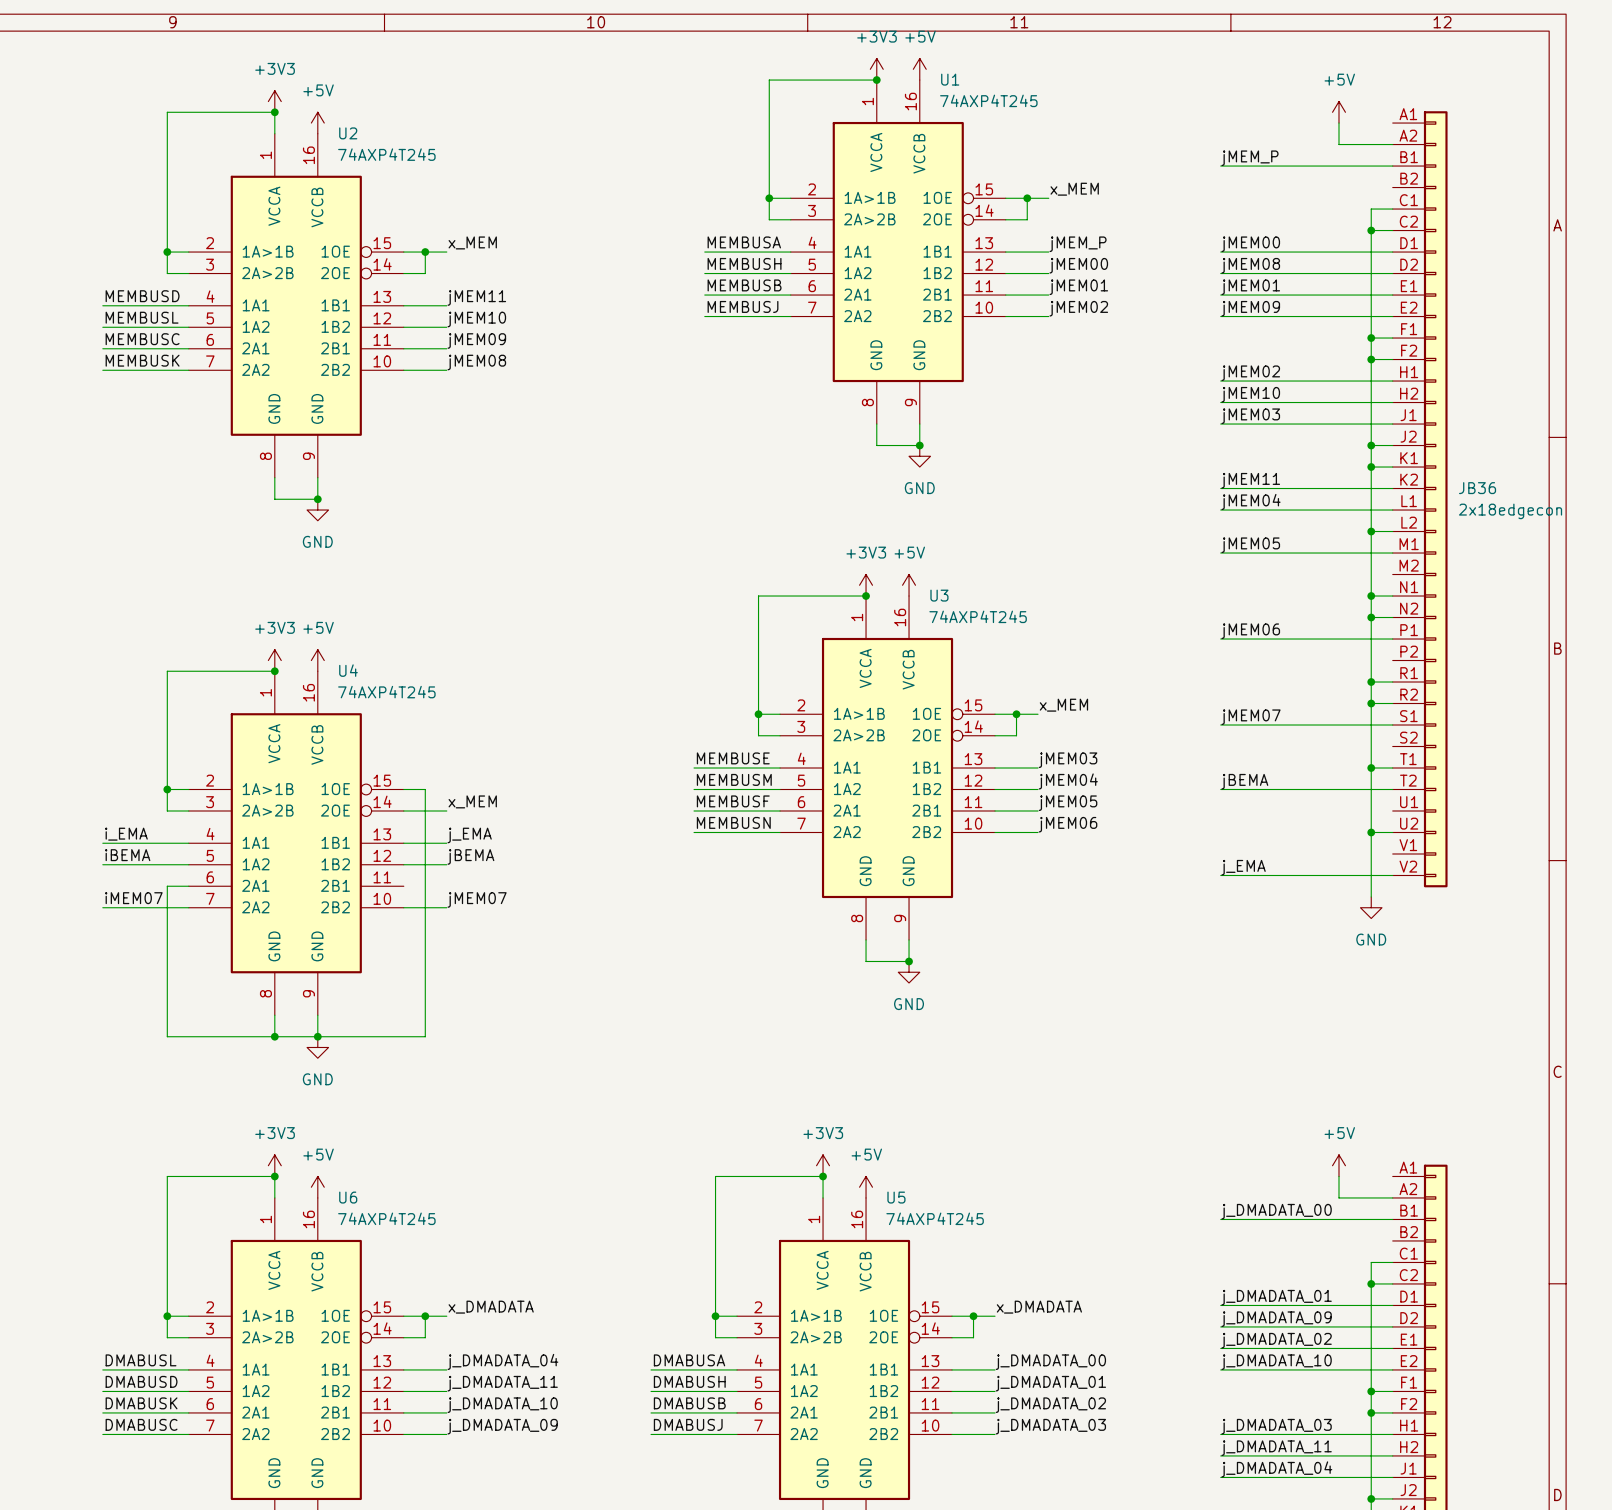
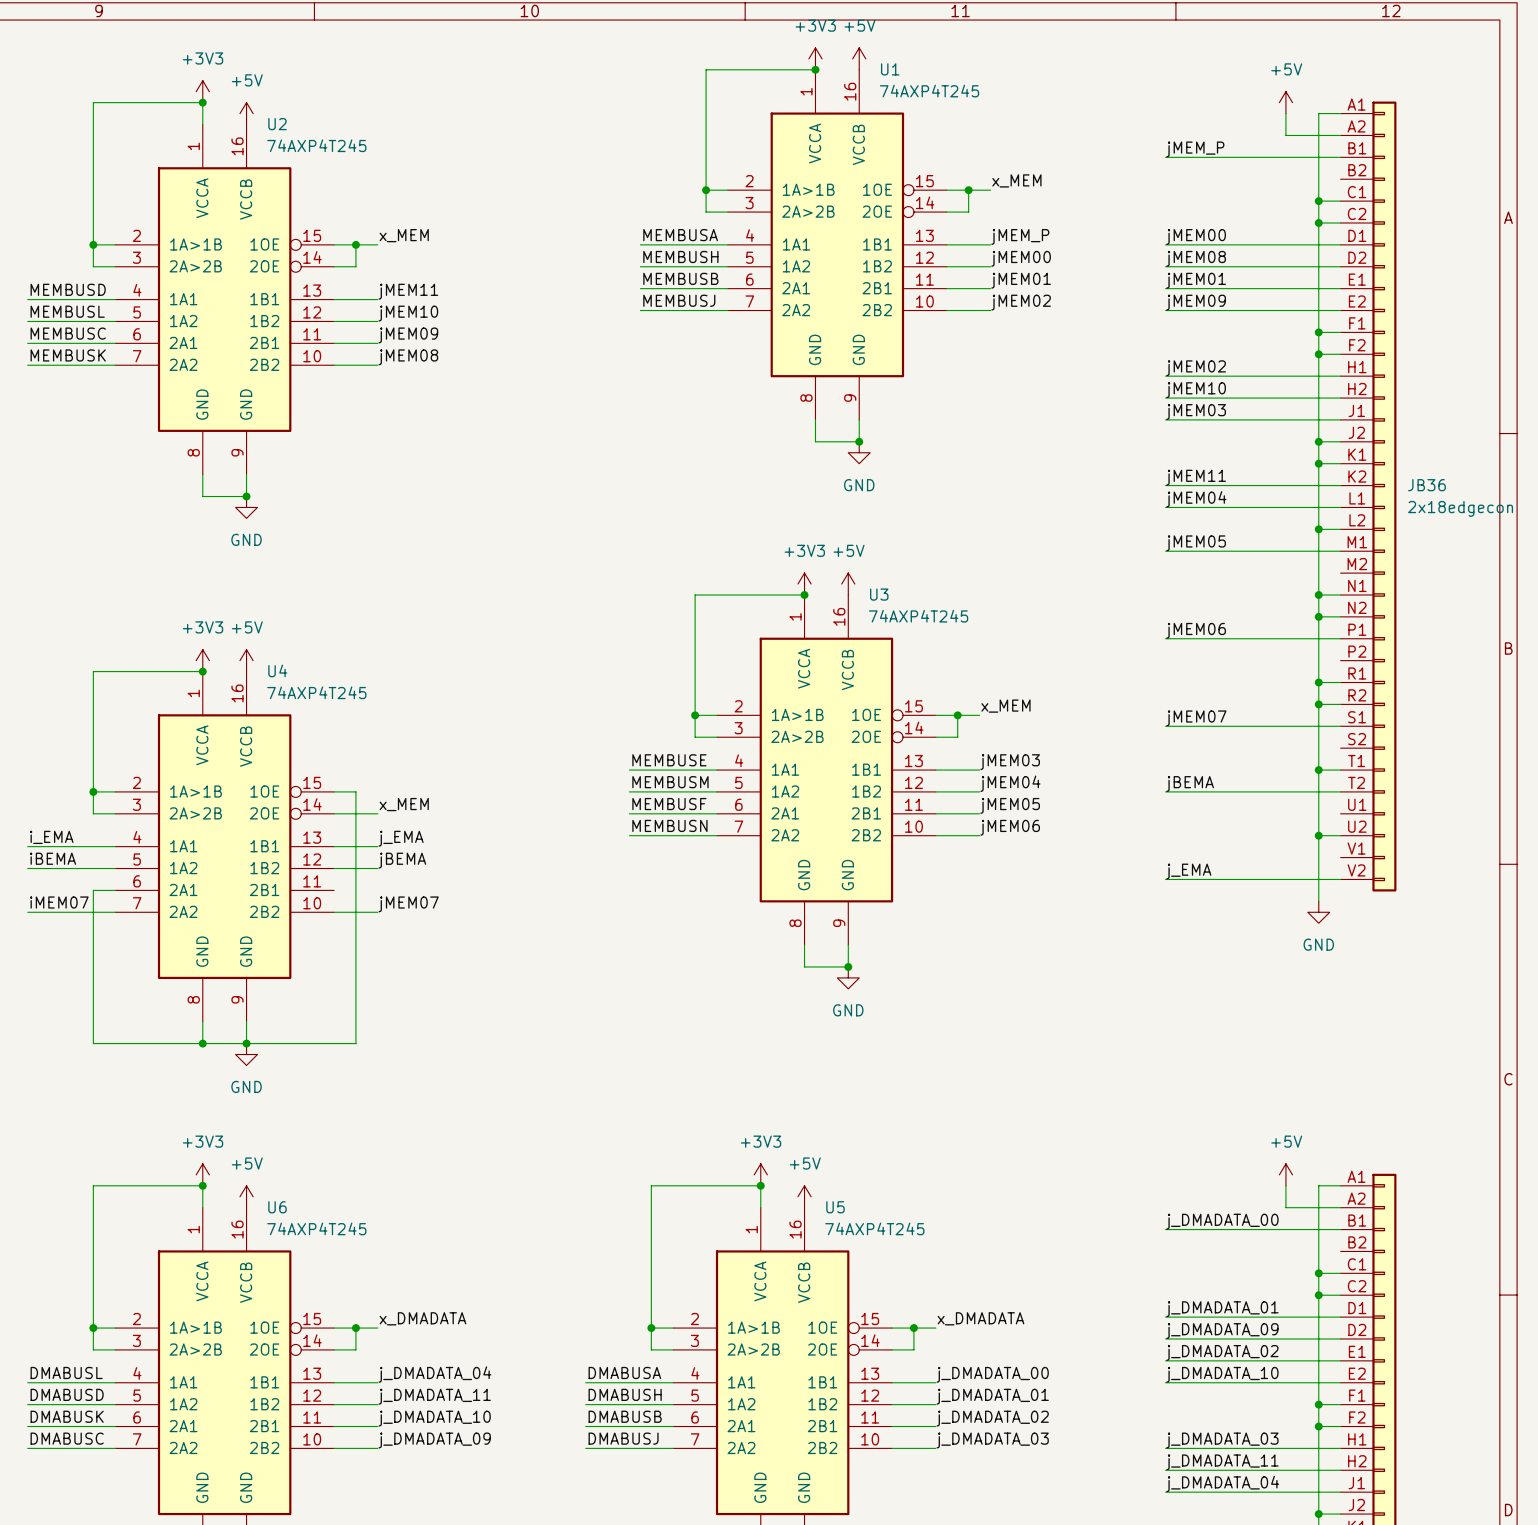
wire: none -> (1340, 113) (1318, 113) (1318, 201)
junction: none -> (1318, 201)
wire: none -> (1340, 1185) (1318, 1185) (1318, 1273)
junction: none -> (1318, 1273)

